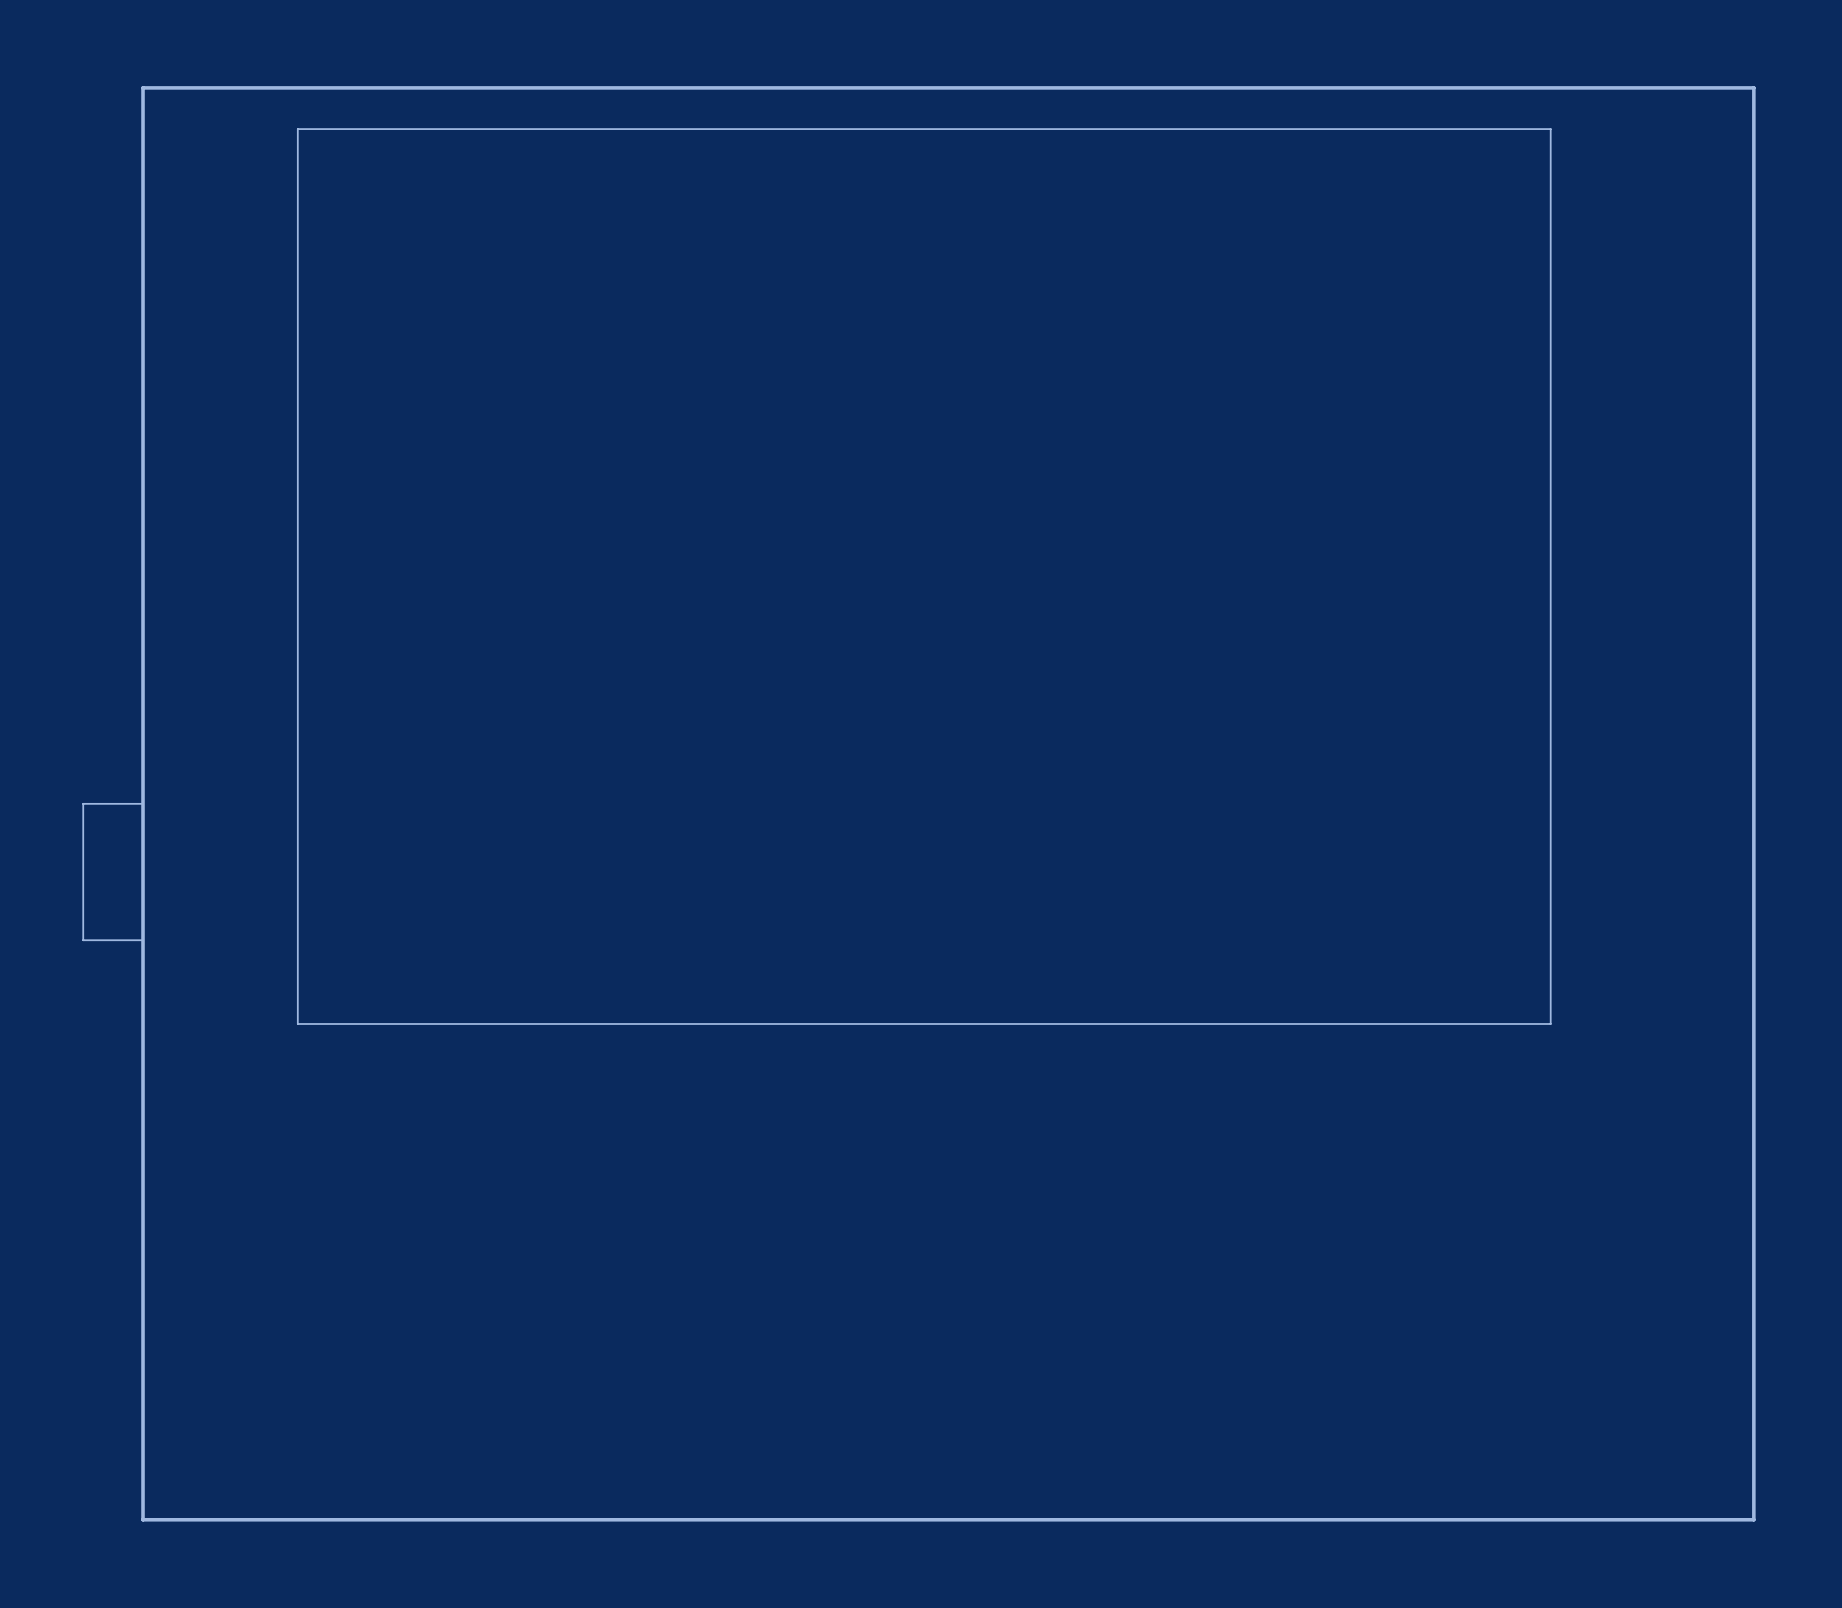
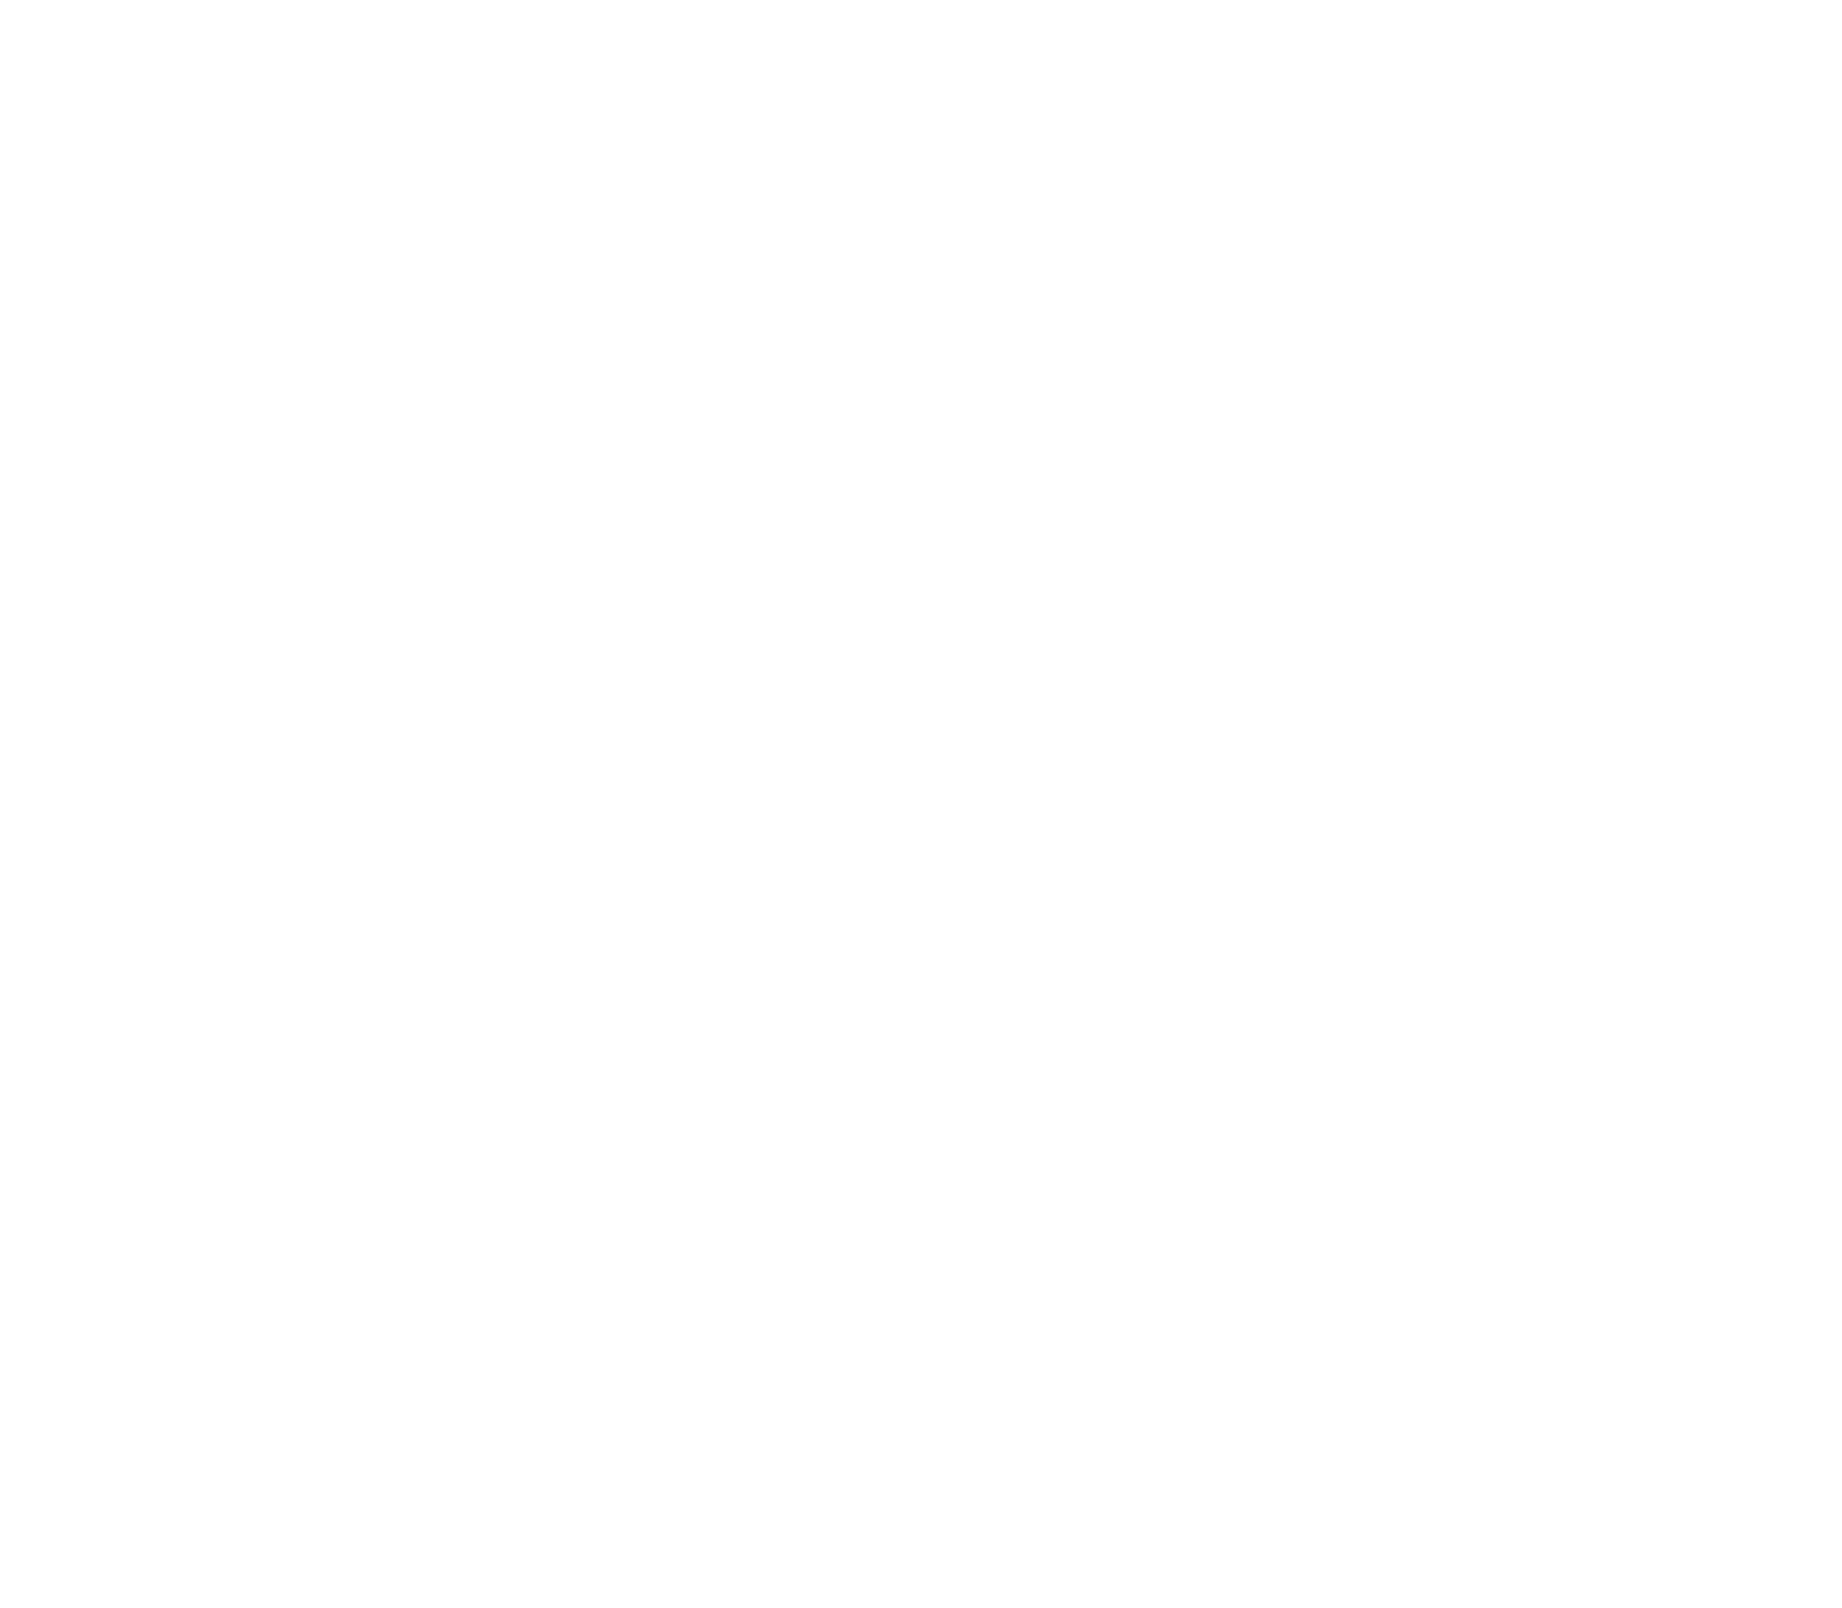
line: (143, 87) (1753, 87) (1753, 1519) (143, 1519) (143, 87) -> none
line: (297, 129) (1550, 129) (1550, 1023) (297, 1023) (297, 129) -> none
line: (83, 803) (143, 803) (143, 940) (83, 940) (83, 803) -> none

